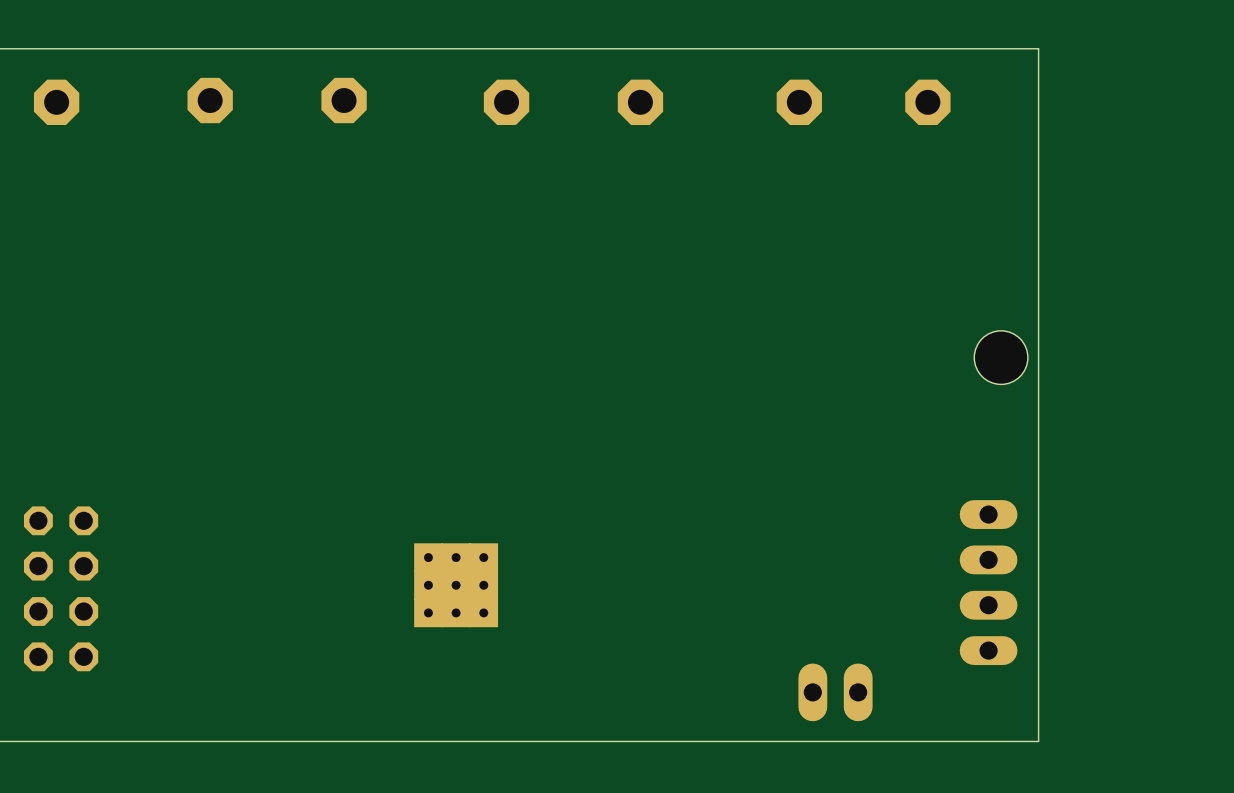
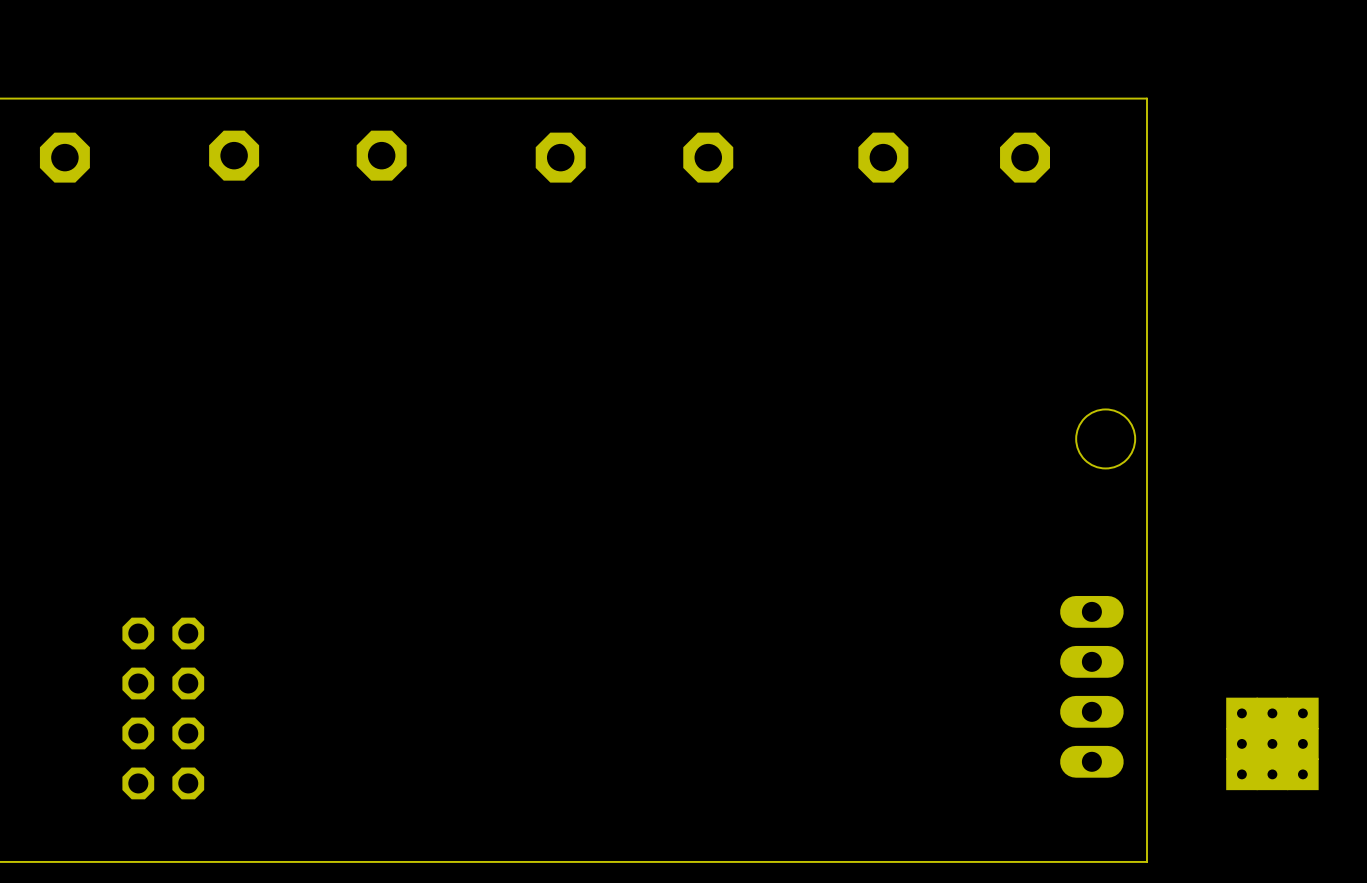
part: (456, 585) -> none
part position: (61, 588) -> (163, 708)
part: none -> (1272, 743)
part: (835, 692) -> none

